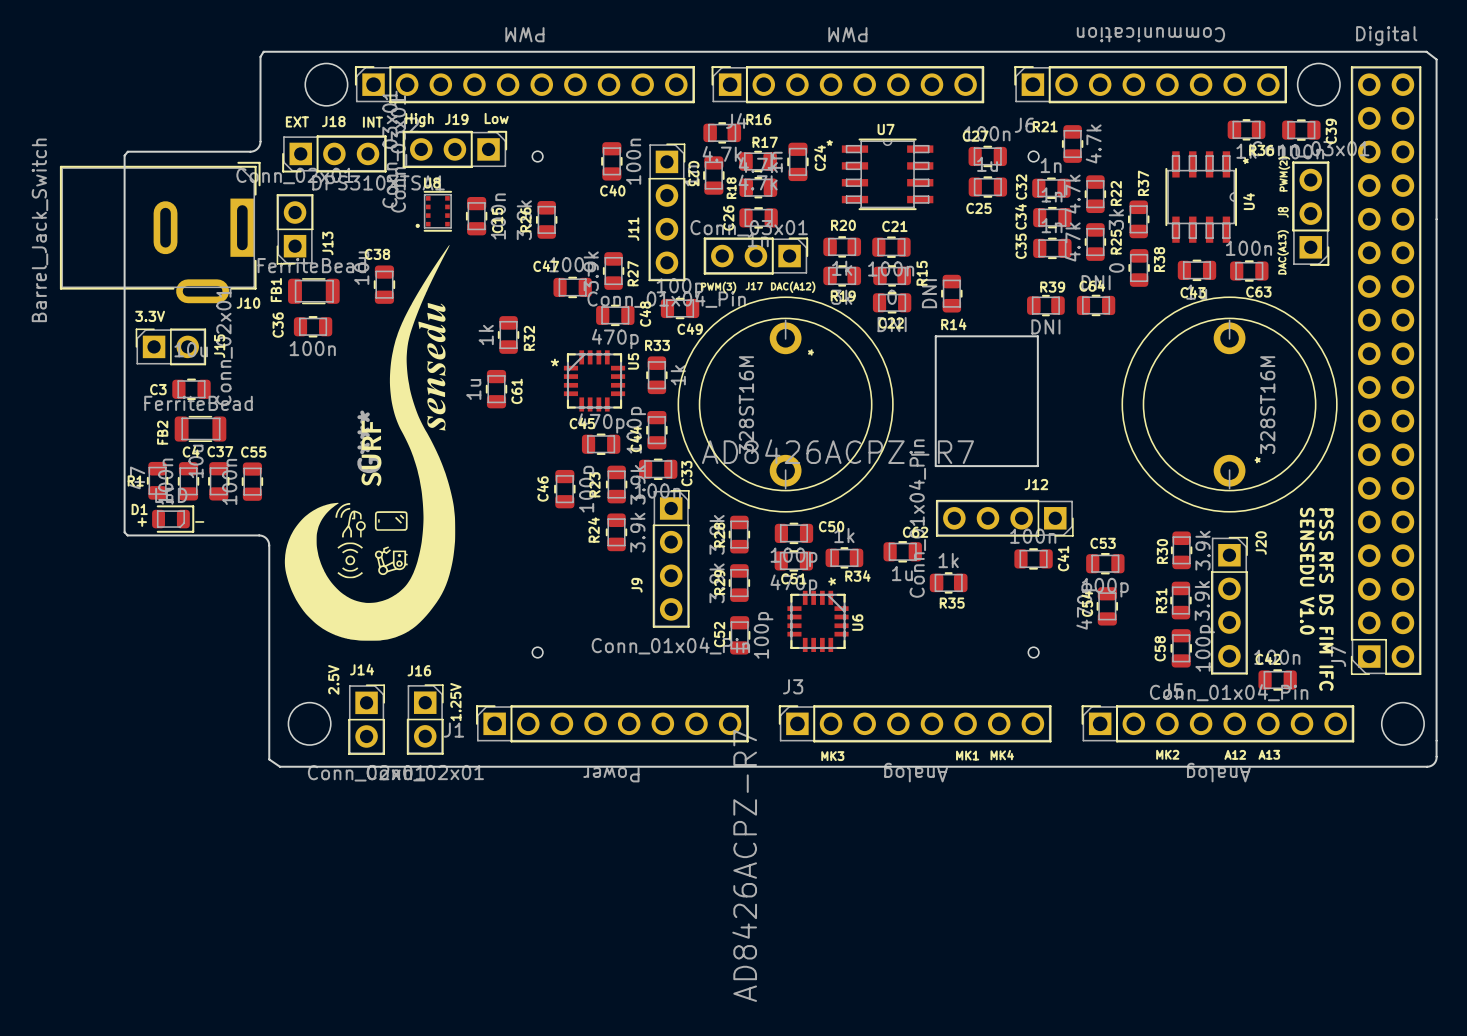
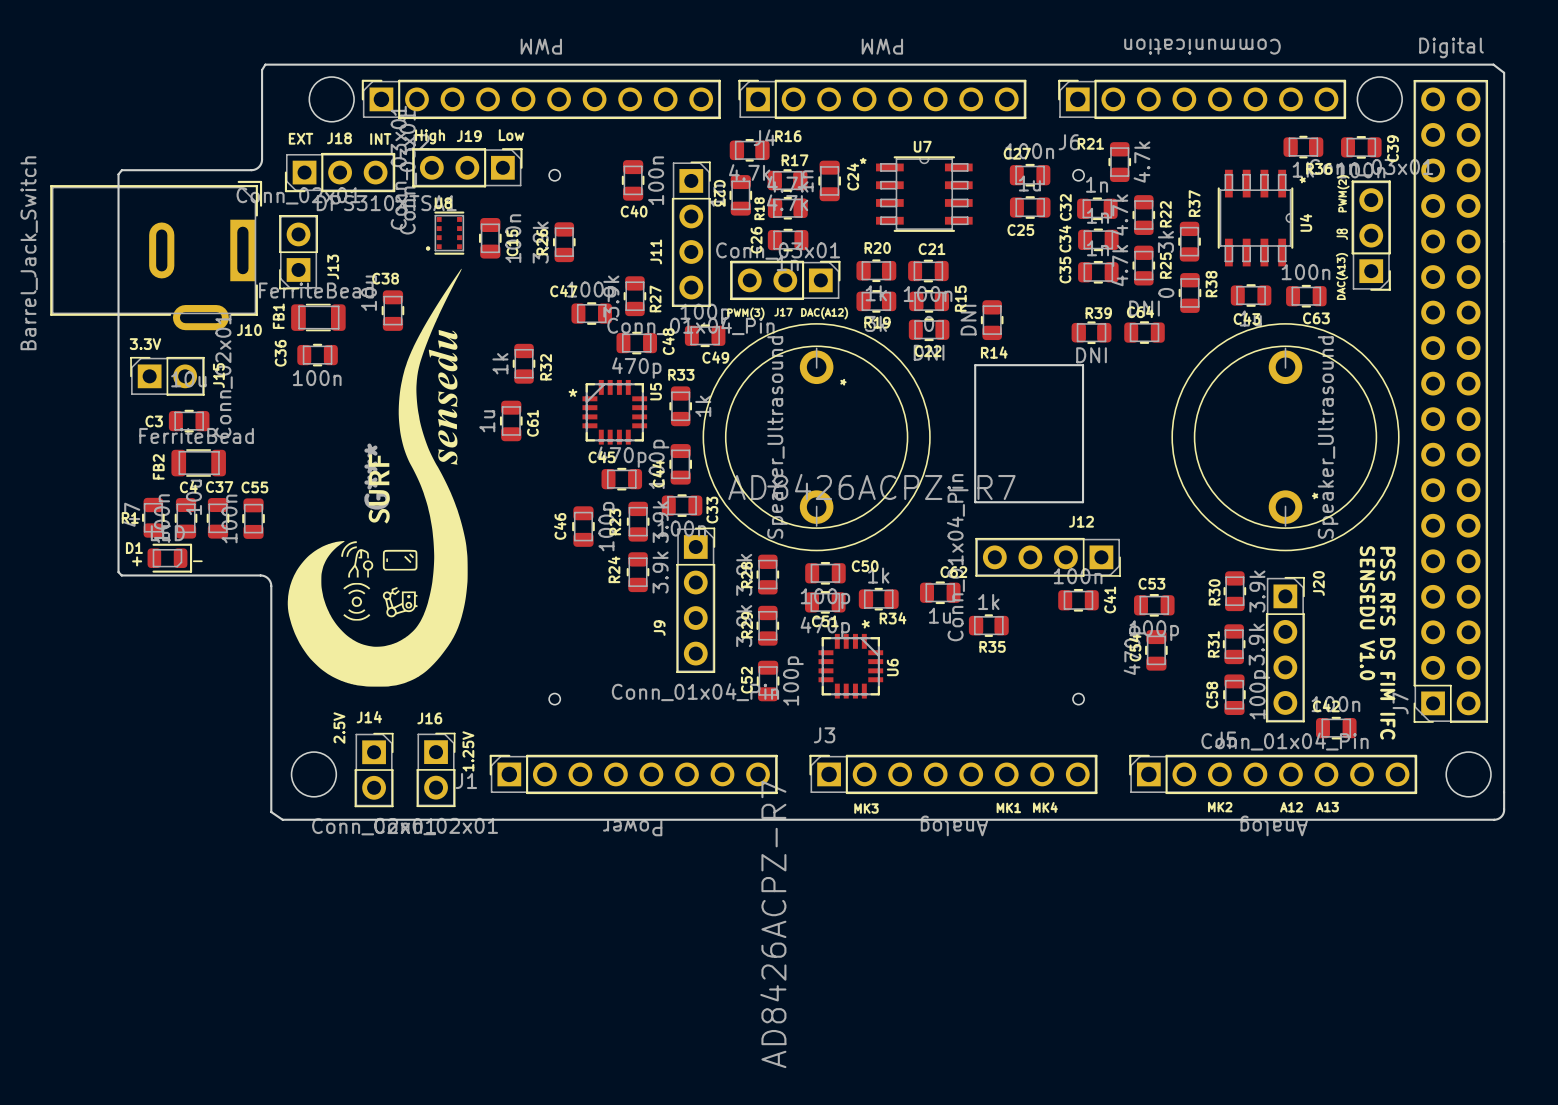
part value: 328ST16M (746, 405) -> Speaker_Ultrasound (777, 437)
part value: 328ST16M (1267, 405) -> Speaker_Ultrasound (1328, 437)

